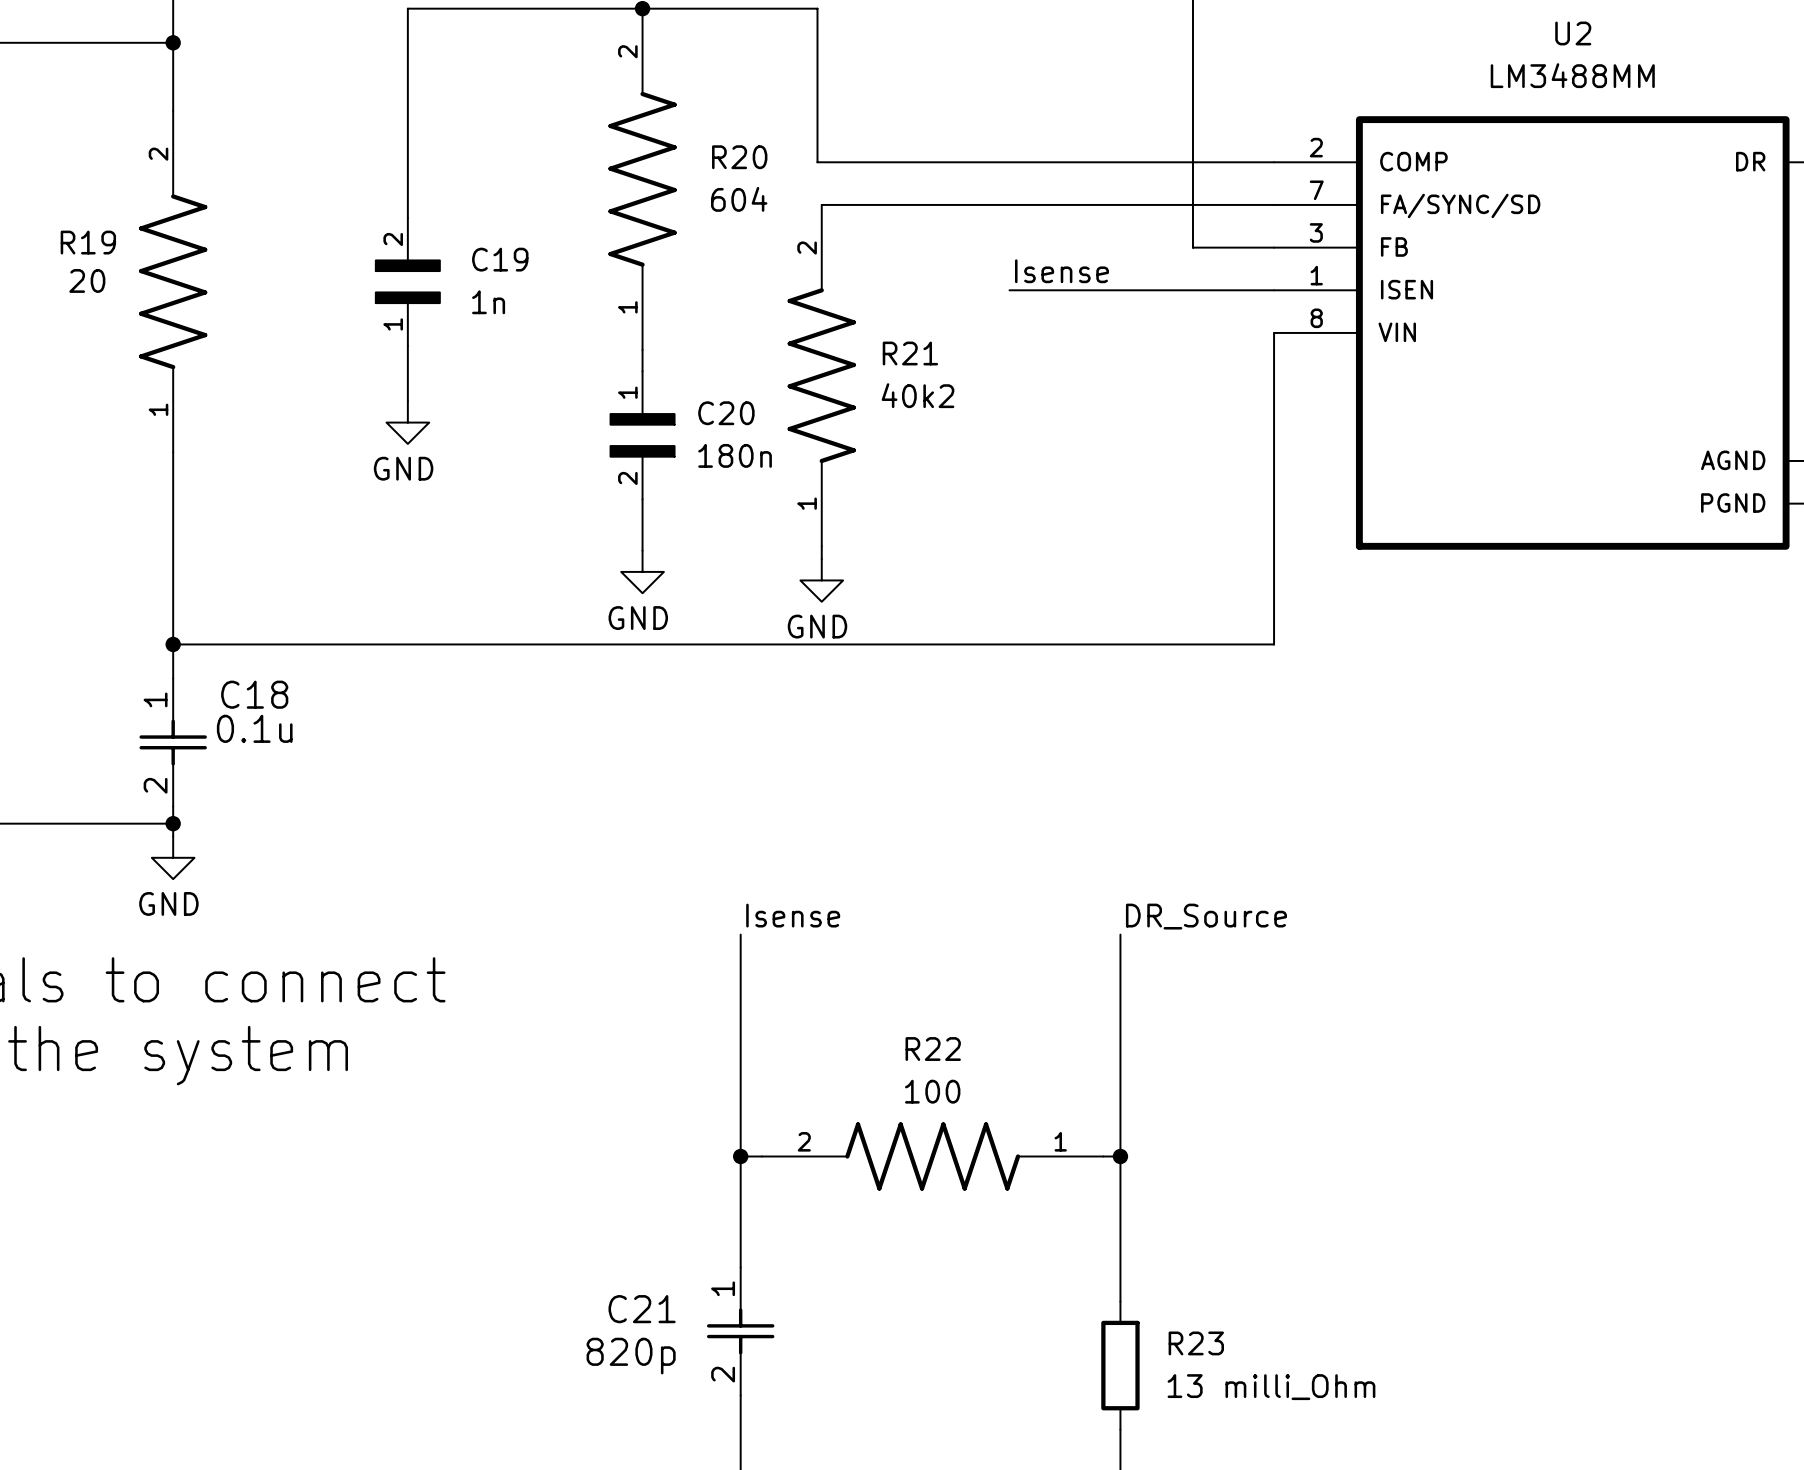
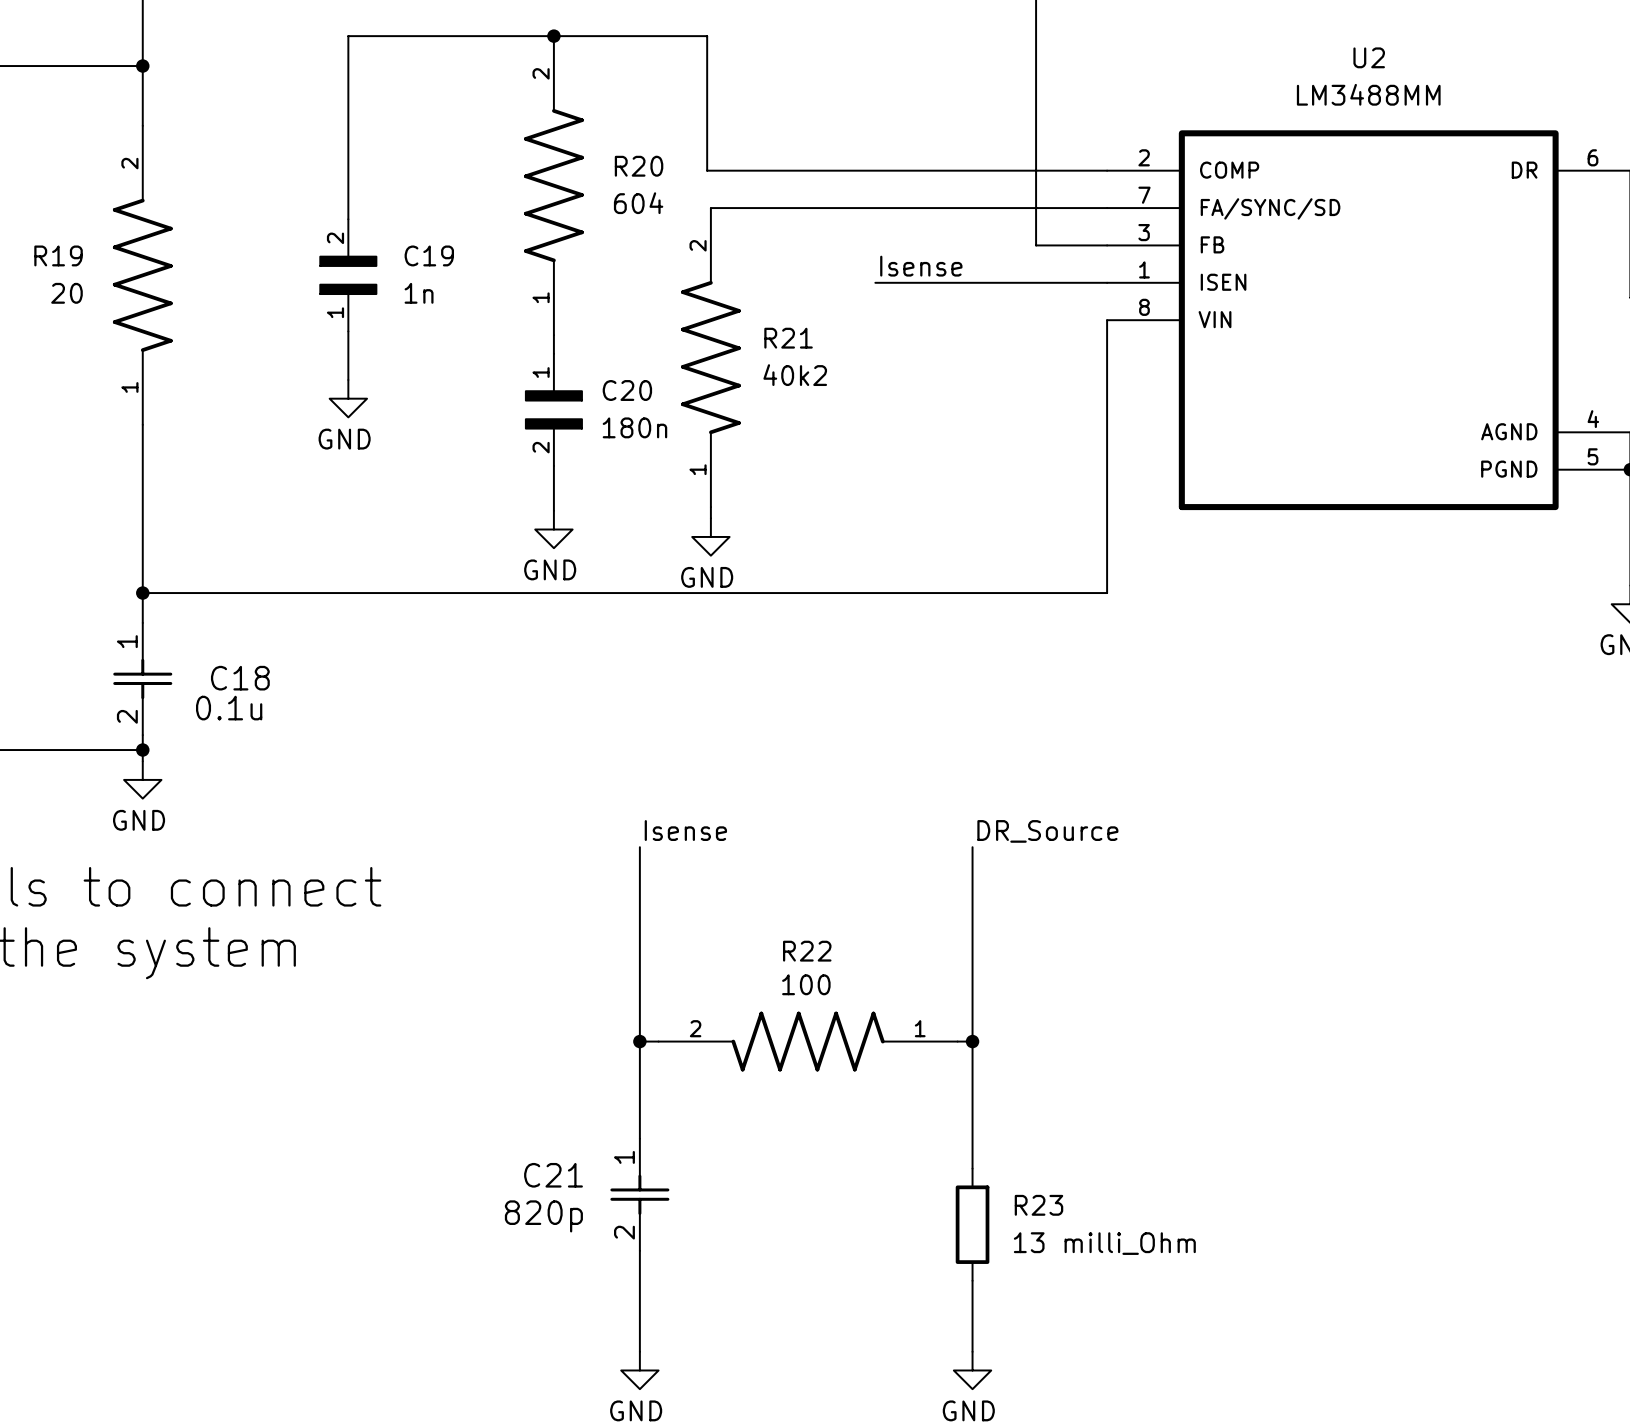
R19 flip: as is (173, 281) -> left-right (142, 275)
C18 name position: C18 (254, 694) -> C18 (240, 678)
C18 value position: 0.1u (254, 728) -> 0.1u (229, 708)
R22 flip: as is (932, 1156) -> up-down (808, 1041)

